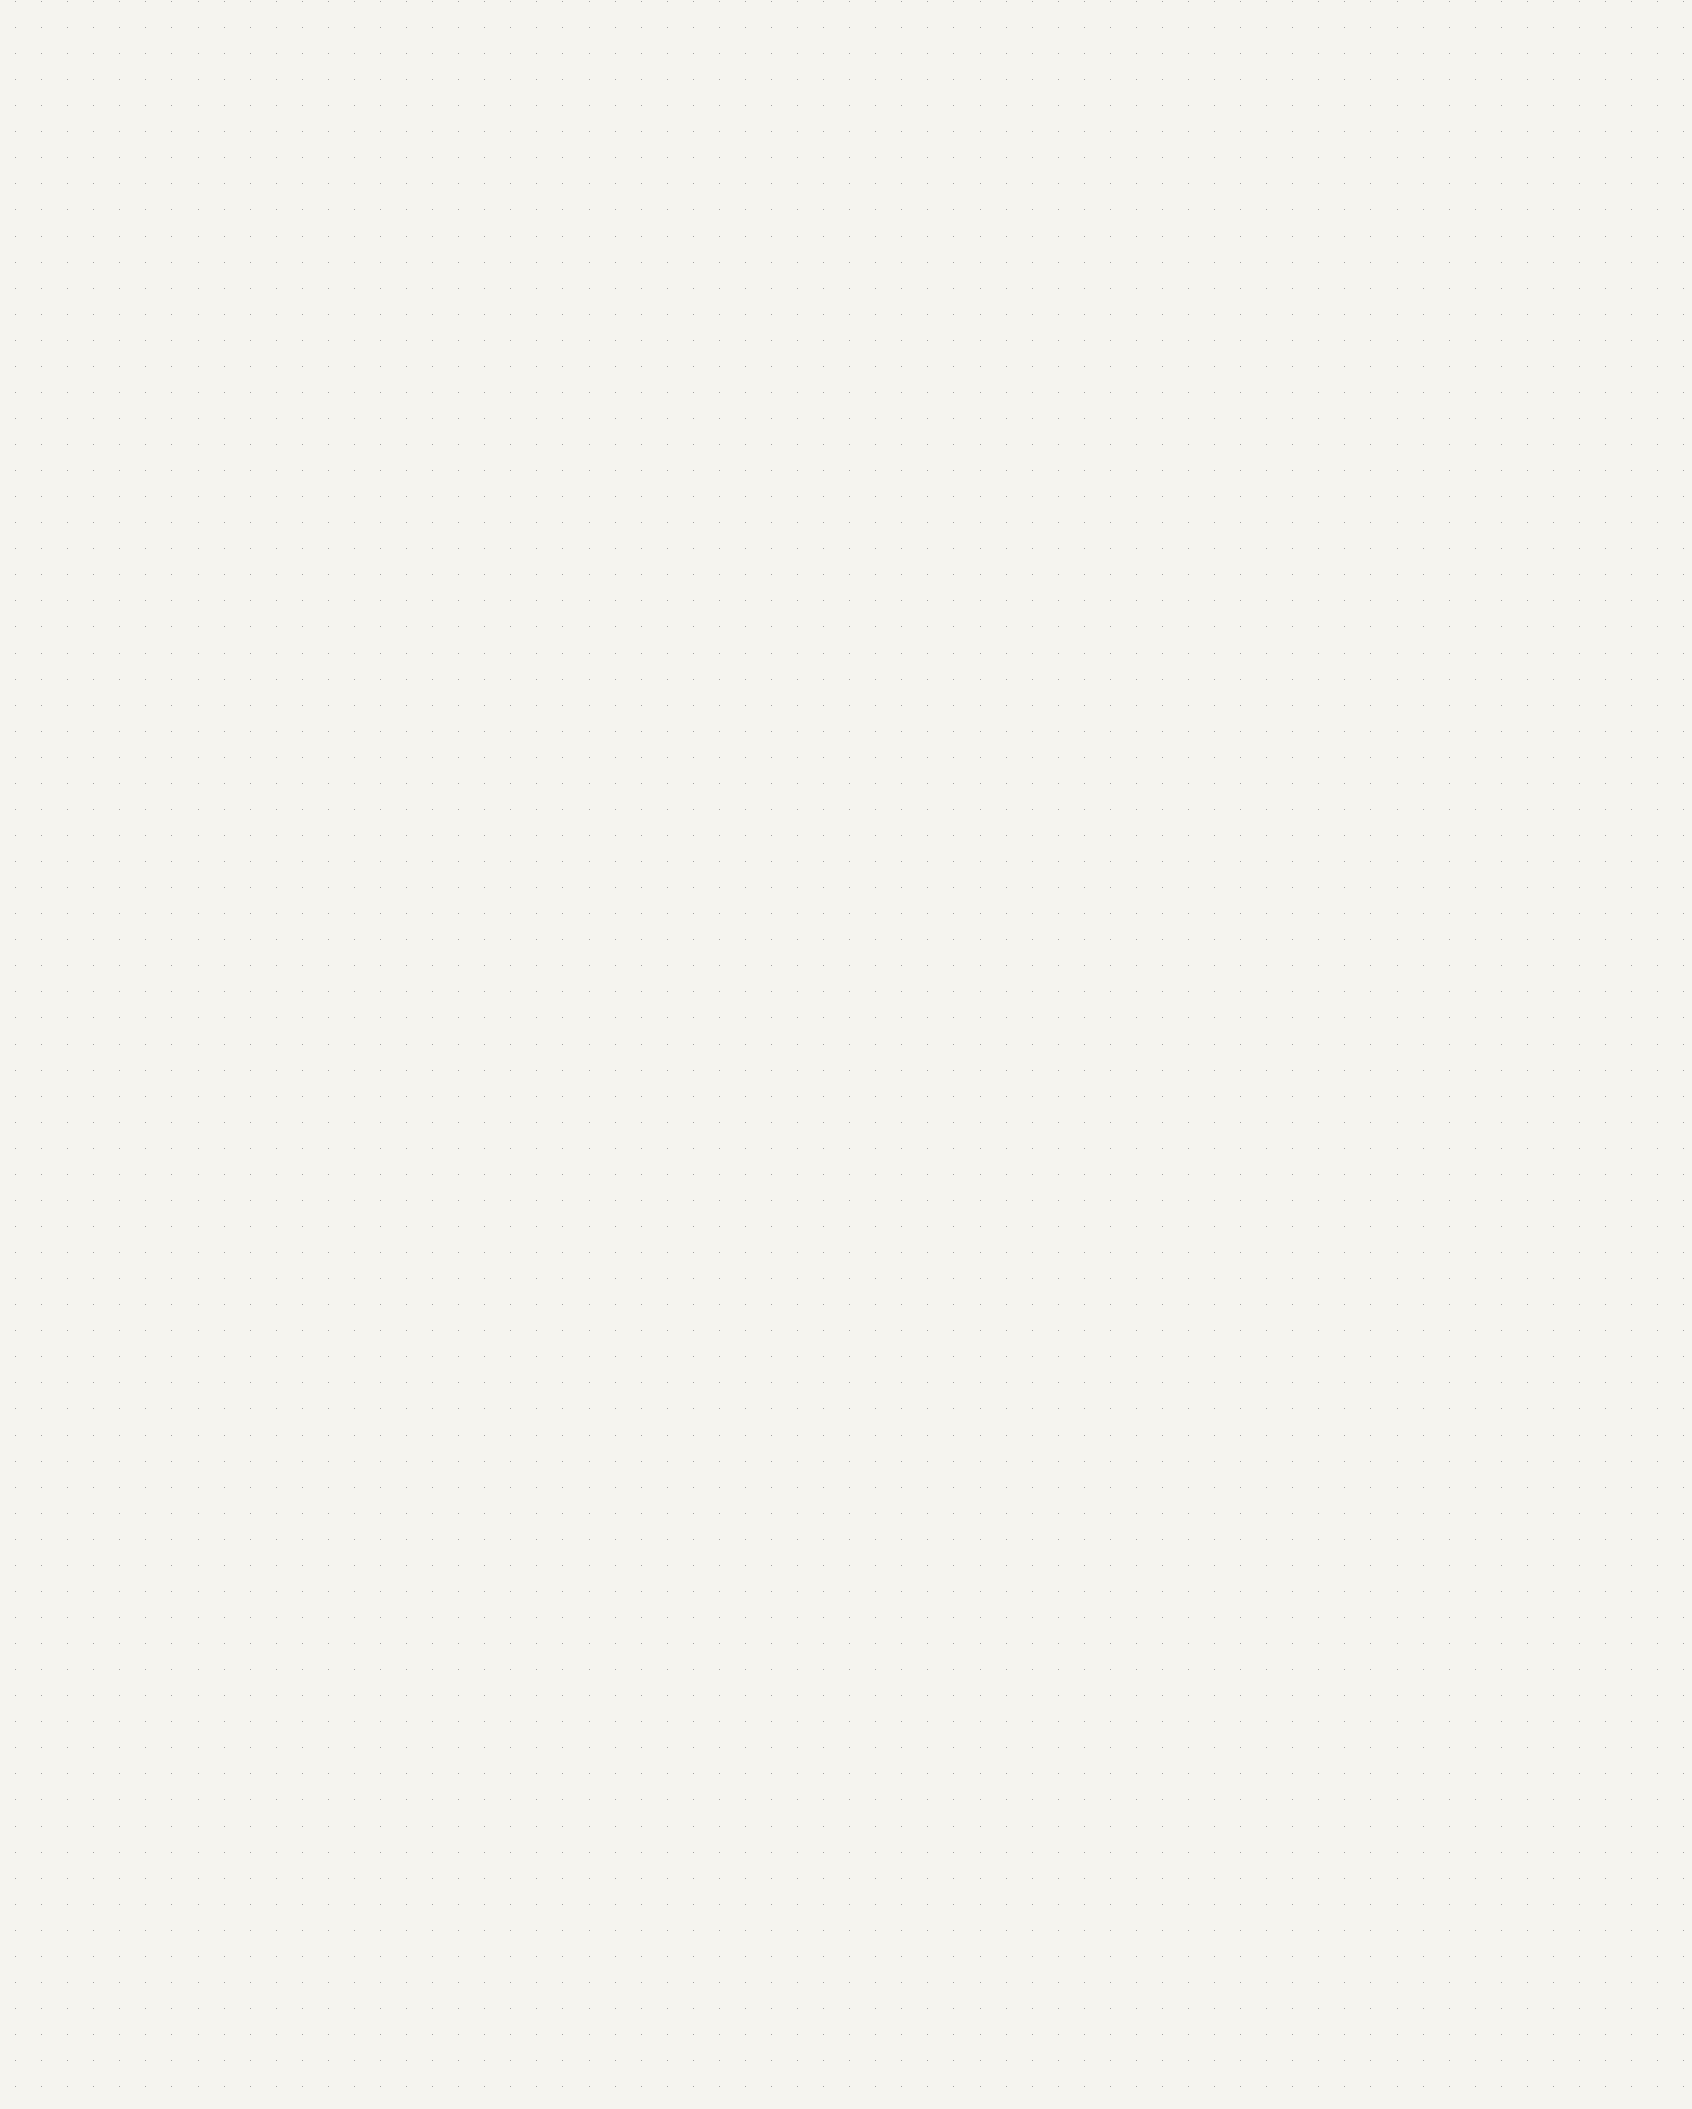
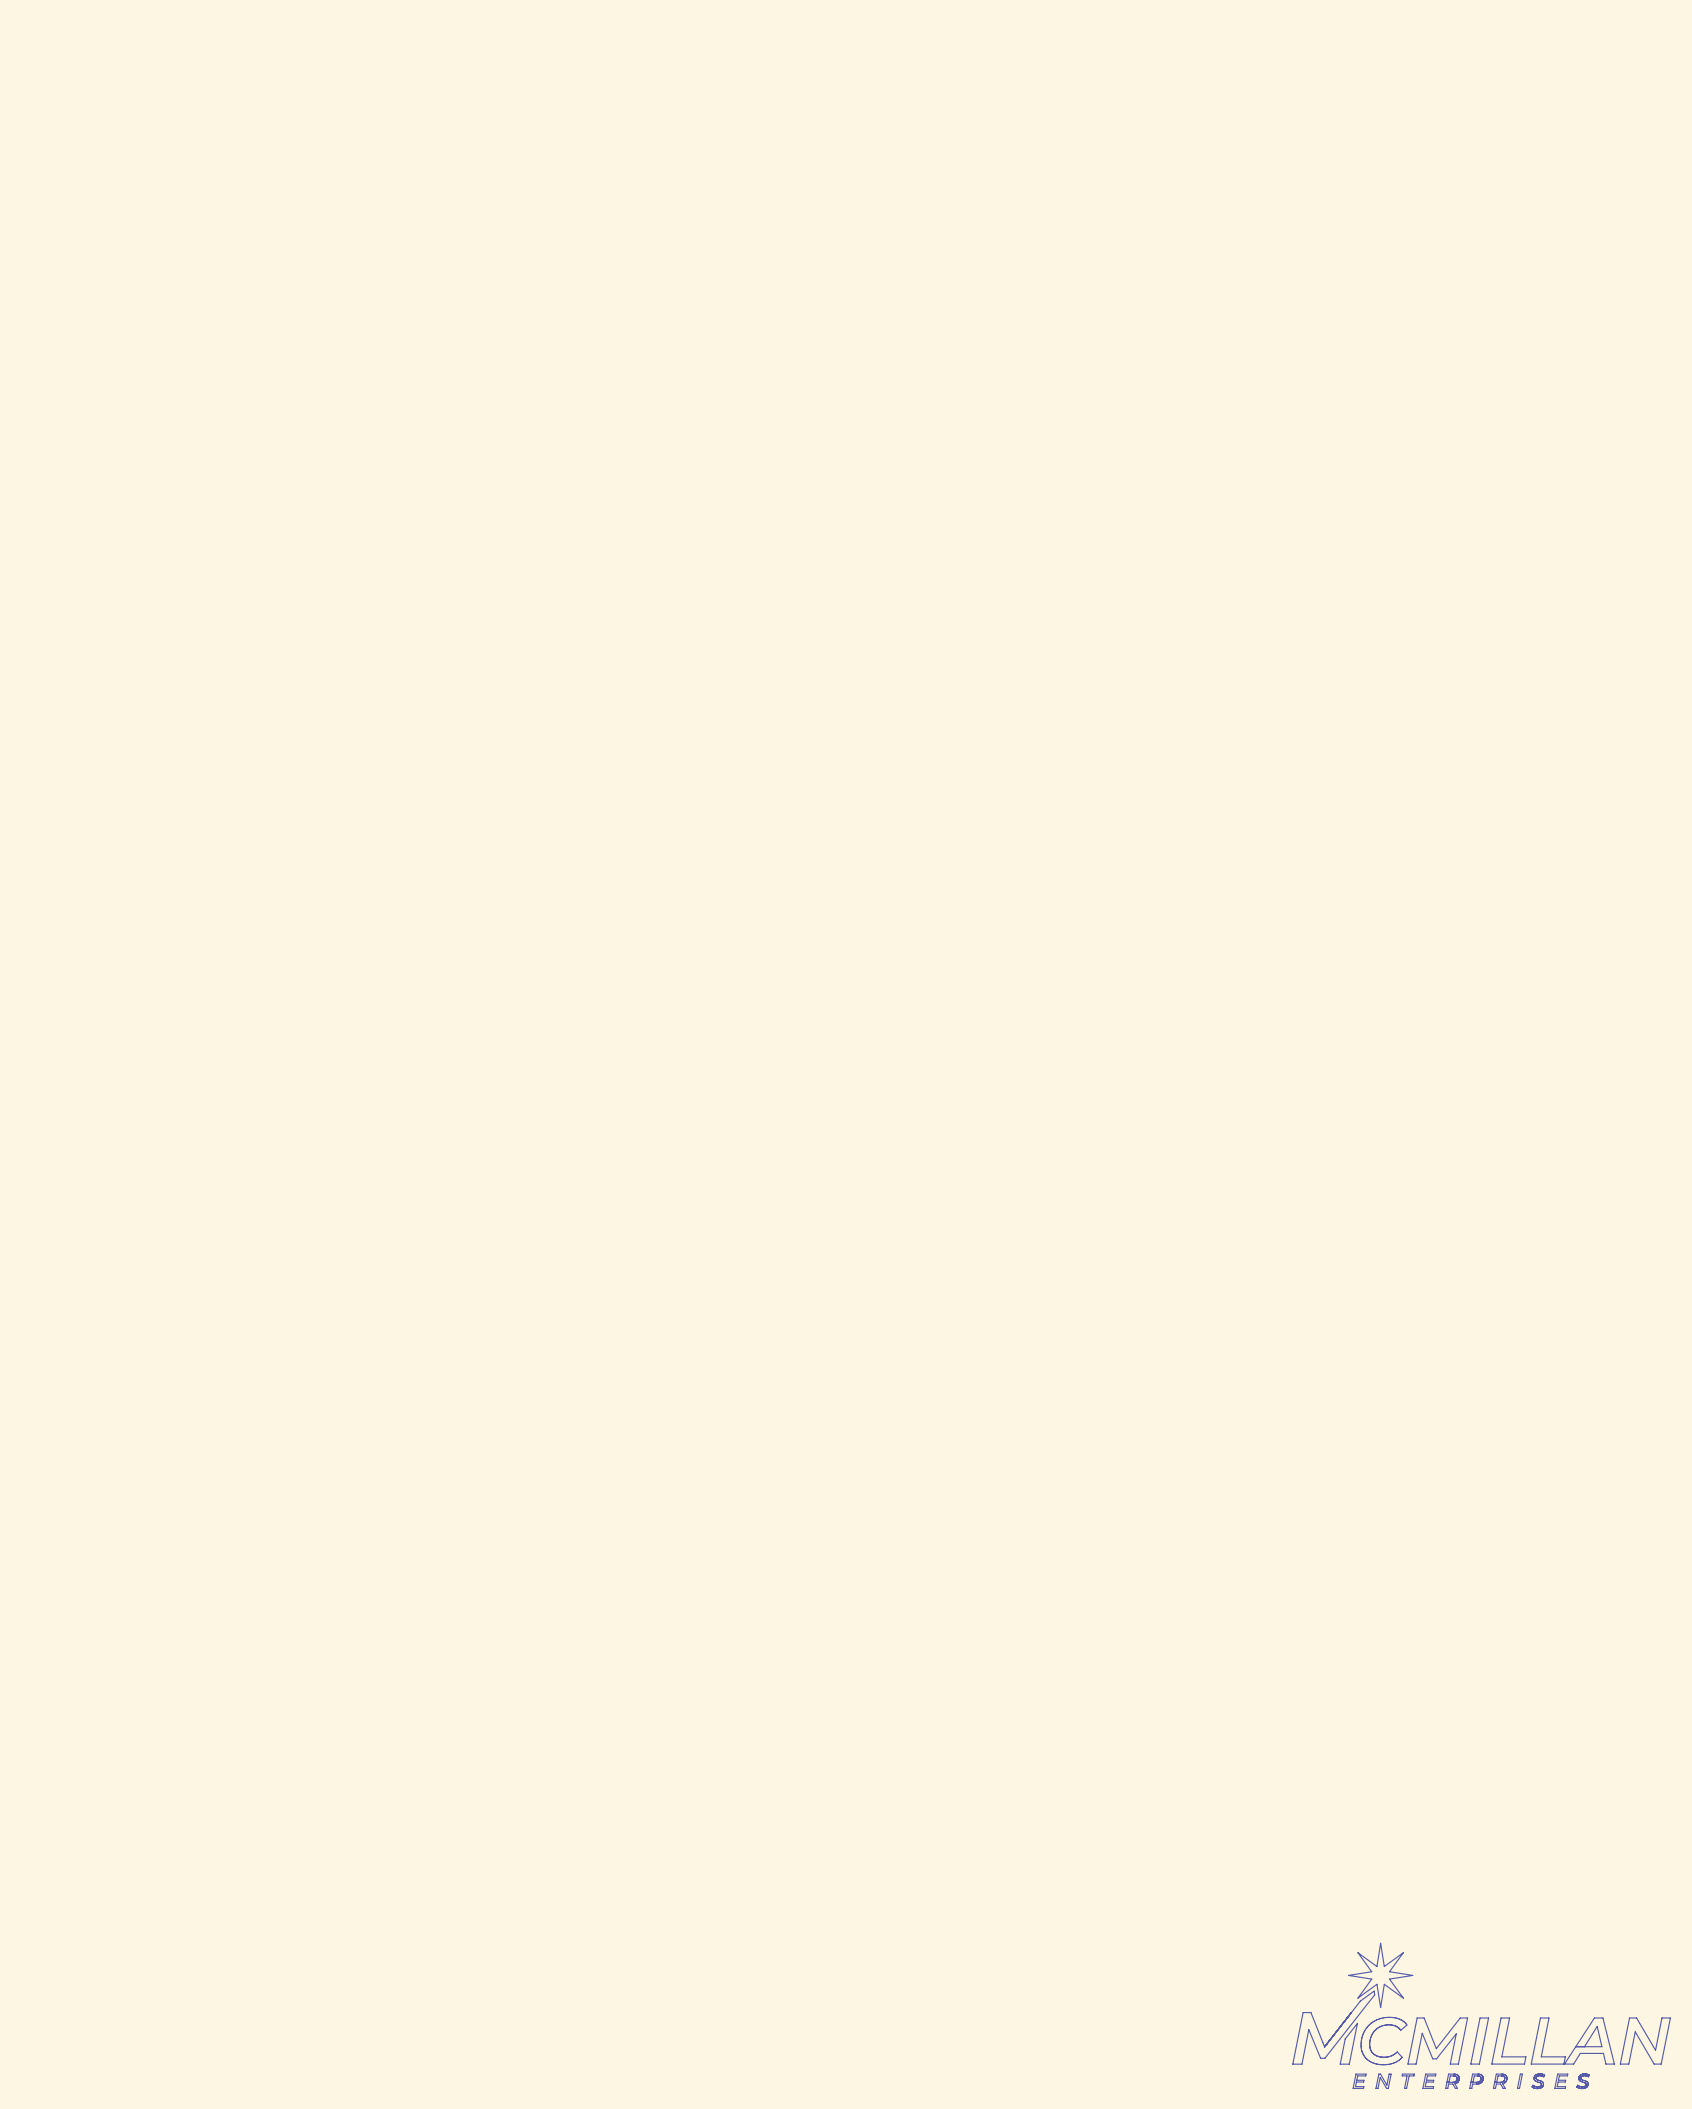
line: none -> (1380, 1943) (1376, 1966) (1357, 1952) (1371, 1971) (1348, 1975) (1371, 1979) (1357, 1998) (1376, 1984) (1380, 2007) (1384, 1984) (1403, 1998) (1389, 1979) (1412, 1975) (1389, 1971) (1403, 1952) (1384, 1966) (1380, 1943)
line: none -> (1389, 2017) (1372, 2021) (1362, 2035) (1361, 2045) (1362, 2053) (1366, 2059) (1374, 2063) (1390, 2064) (1402, 2057) (1397, 2051) (1389, 2056) (1379, 2056) (1373, 2054) (1370, 2049) (1371, 2036) (1378, 2027) (1390, 2024) (1400, 2030) (1406, 2025) (1399, 2019) (1389, 2017)
line: none -> (1417, 2018) (1424, 2018) (1436, 2048) (1460, 2018) (1467, 2018) (1458, 2064) (1450, 2064) (1456, 2033) (1436, 2058) (1432, 2058) (1422, 2033) (1416, 2064) (1407, 2064) (1417, 2018)
line: none -> (1480, 2018) (1488, 2018) (1479, 2064) (1470, 2064) (1480, 2018)
line: none -> (1501, 2018) (1509, 2018) (1501, 2056) (1525, 2056) (1524, 2064) (1491, 2064) (1501, 2018)
line: none -> (1540, 2018) (1549, 2018) (1541, 2056) (1565, 2056) (1563, 2064) (1531, 2064) (1540, 2018)
line: none -> (1629, 2018) (1636, 2018) (1655, 2050) (1661, 2018) (1670, 2018) (1661, 2064) (1654, 2064) (1635, 2031) (1628, 2064) (1620, 2064) (1629, 2018)
line: none -> (1357, 2023) (1345, 2038) (1340, 2064) (1349, 2064) (1357, 2023)
line: none -> (1324, 2046) (1310, 2012) (1303, 2012) (1292, 2064) (1301, 2064) (1308, 2029) (1320, 2058) (1324, 2058) (1374, 1994) (1374, 1991) (1360, 2001) (1324, 2046)
line: none -> (1575, 2046) (1564, 2064) (1573, 2064) (1580, 2053) (1603, 2053) (1605, 2064) (1614, 2064) (1602, 2018) (1594, 2018) (1575, 2046)
line: none -> (1575, 2046) (1601, 2046) (1597, 2026) (1584, 2046)
line: none -> (1355, 2074) (1366, 2074) (1365, 2075) (1357, 2075) (1356, 2080) (1363, 2080) (1363, 2082) (1356, 2082) (1355, 2086) (1363, 2086) (1363, 2088) (1353, 2088) (1355, 2074)
line: none -> (1378, 2074) (1386, 2085) (1389, 2074) (1391, 2074) (1388, 2088) (1380, 2077) (1378, 2088) (1375, 2088) (1378, 2074)
line: none -> (1402, 2074) (1402, 2075) (1407, 2075) (1404, 2088) (1406, 2088) (1409, 2075) (1413, 2075) (1414, 2074) (1402, 2074)
line: none -> (1425, 2074) (1435, 2074) (1435, 2075) (1427, 2075) (1426, 2080) (1433, 2080) (1433, 2082) (1426, 2082) (1425, 2086) (1433, 2086) (1433, 2088) (1422, 2088) (1425, 2074)
line: none -> (1448, 2074) (1458, 2076) (1458, 2080) (1454, 2083) (1457, 2088) (1452, 2084) (1448, 2084) (1447, 2088) (1445, 2088) (1448, 2074)
line: none -> (1520, 2074) (1522, 2074) (1519, 2088) (1517, 2088) (1520, 2074)
line: none -> (1557, 2074) (1567, 2074) (1567, 2075) (1559, 2075) (1558, 2080) (1565, 2080) (1565, 2082) (1558, 2082) (1557, 2086) (1565, 2086) (1565, 2088) (1554, 2088) (1557, 2074)
line: none -> (1453, 2075) (1450, 2075) (1448, 2082)
line: none -> (1477, 2075) (1474, 2075) (1473, 2082)
line: none -> (1501, 2075) (1498, 2075) (1496, 2082)
line: none -> (1536, 2076) (1543, 2076) (1544, 2075) (1538, 2074) (1534, 2076) (1534, 2080) (1541, 2084)
line: none -> (1581, 2076) (1588, 2076) (1589, 2075) (1583, 2074) (1579, 2076) (1579, 2080) (1586, 2084)
line: none -> (1536, 2078) (1542, 2082) (1543, 2085) (1538, 2088) (1532, 2086) (1532, 2085) (1540, 2086)
line: none -> (1580, 2078) (1587, 2082) (1587, 2085) (1583, 2088) (1576, 2086) (1577, 2085) (1585, 2086)
line: none -> (1455, 2081) (1446, 2082)
line: none -> (1479, 2081) (1470, 2082)
line: none -> (1502, 2081) (1494, 2082)
line: none -> (1470, 2082) (1469, 2088) (1471, 2088) (1472, 2084) (1481, 2082) (1482, 2076) (1472, 2074) (1470, 2082)
line: none -> (1494, 2082) (1493, 2088) (1495, 2088) (1496, 2084) (1500, 2084) (1505, 2088) (1502, 2083) (1506, 2081) (1506, 2076) (1496, 2074) (1494, 2082)

